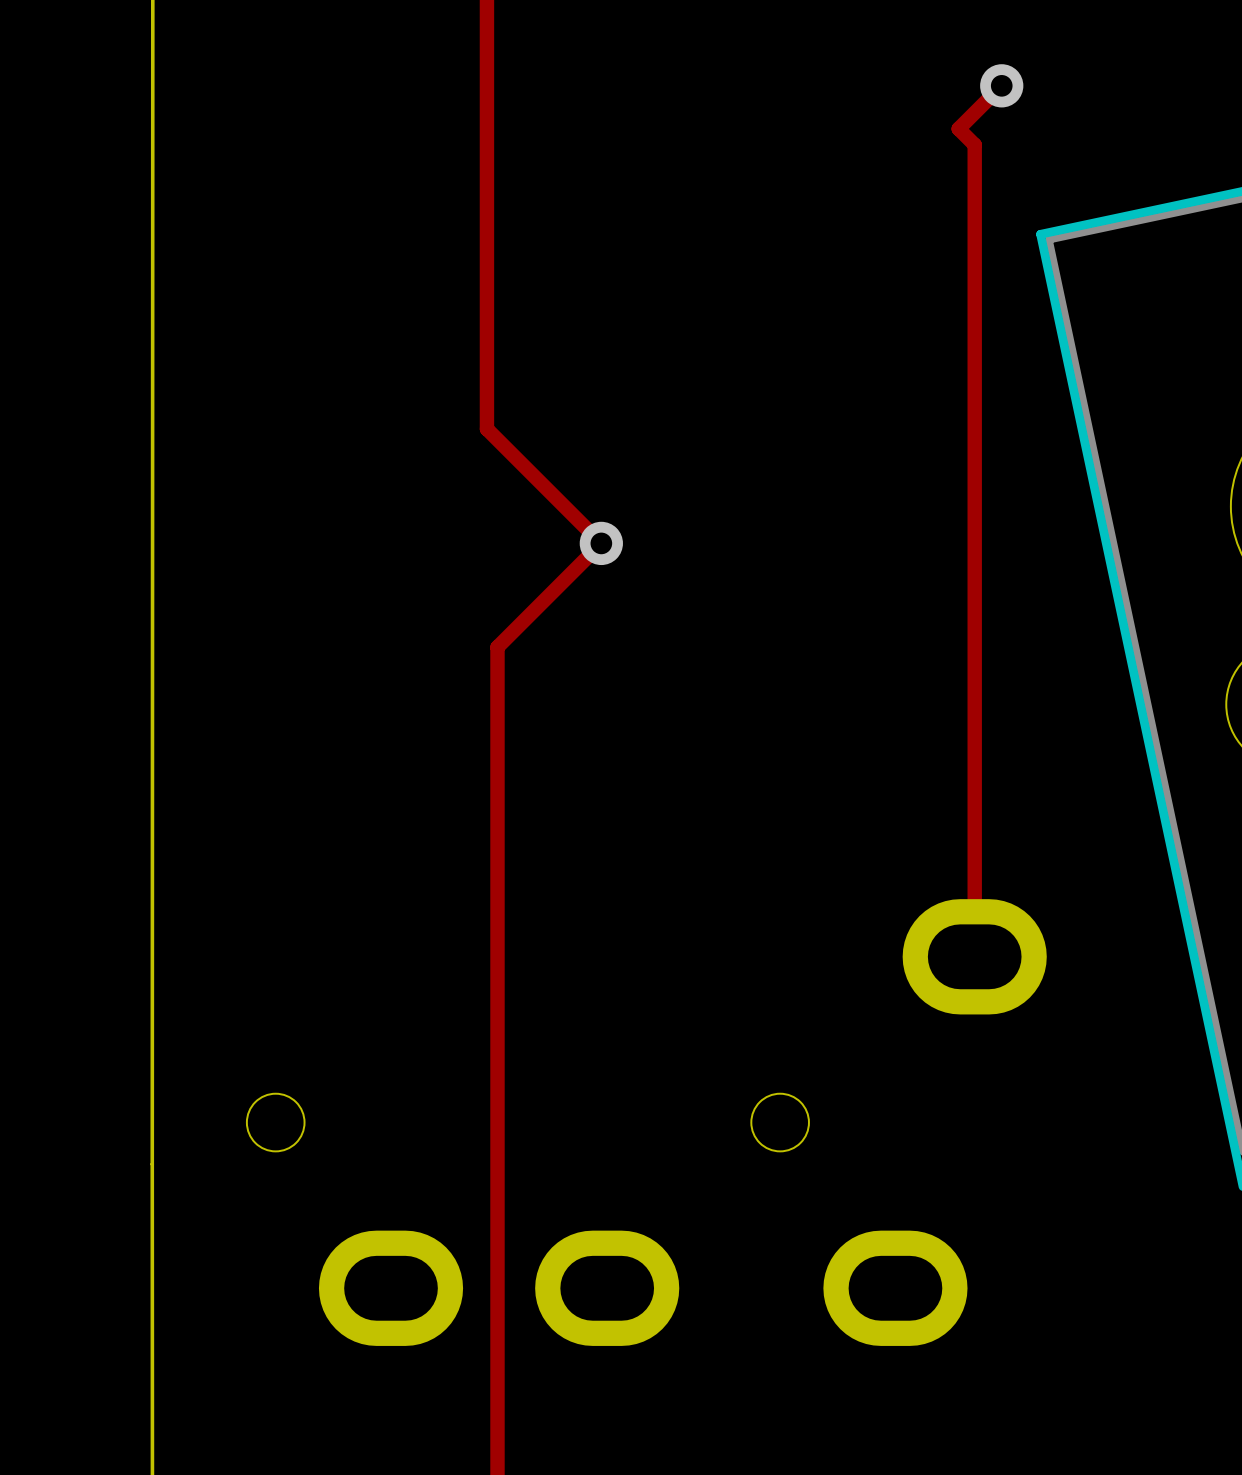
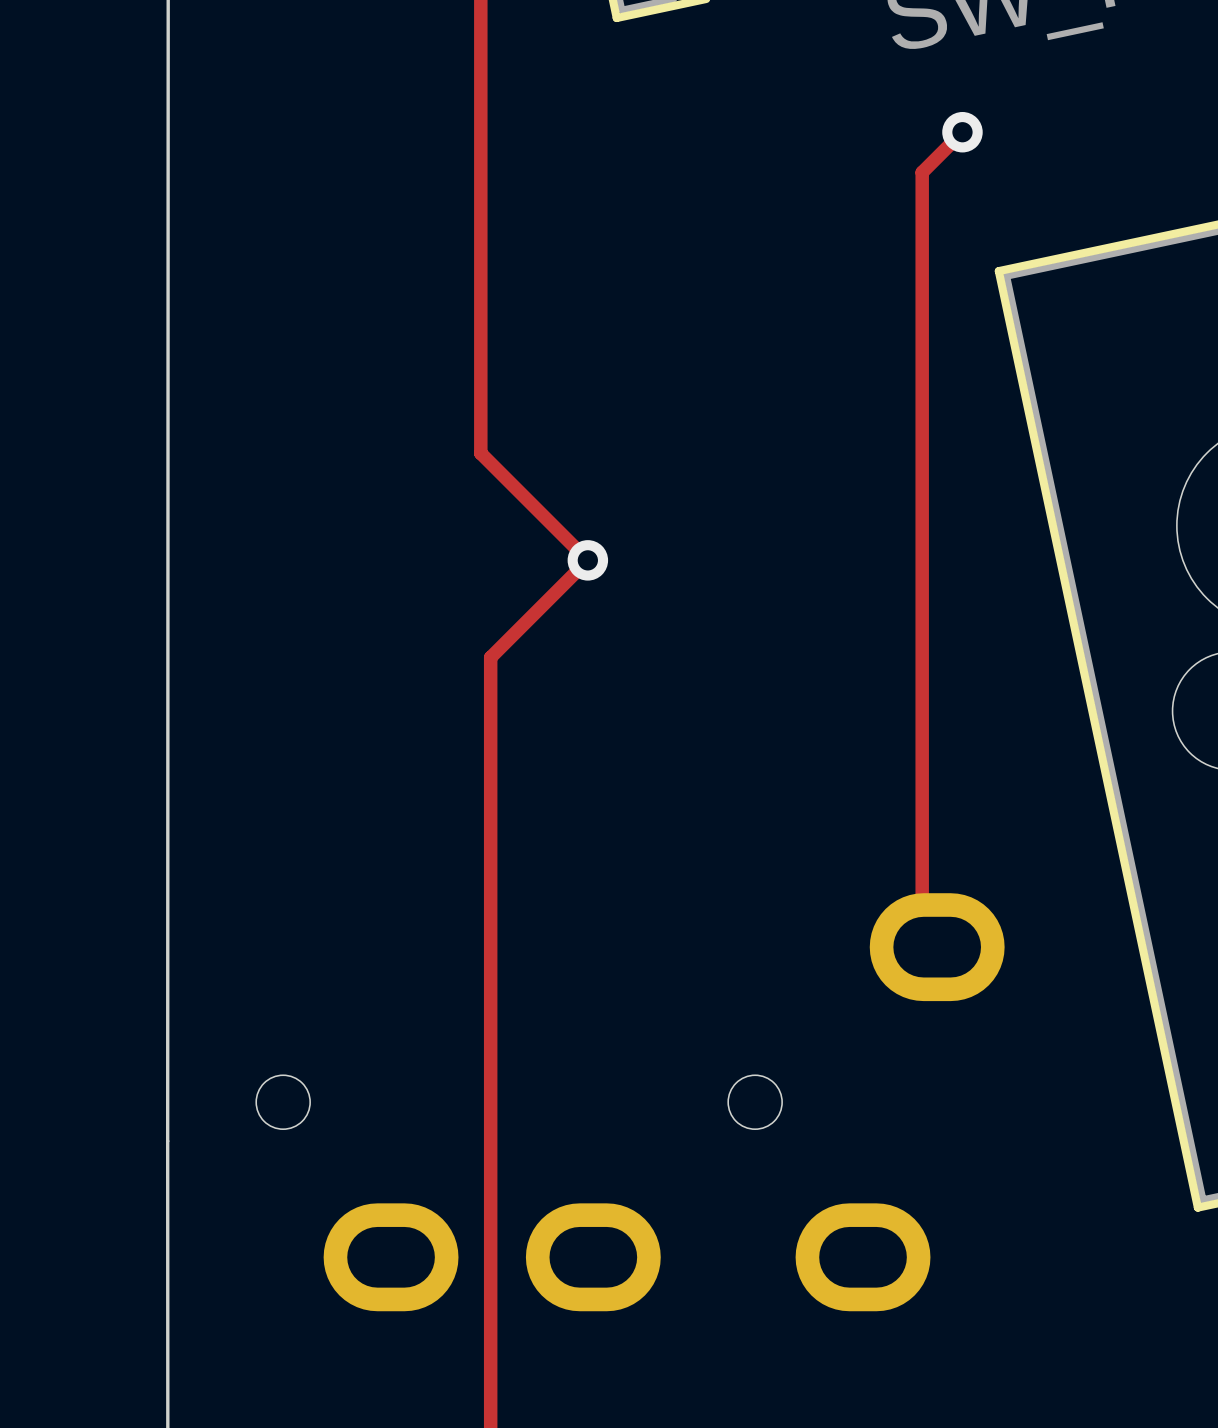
track: (958, 128) (974, 144) (974, 956) -> (922, 172) (922, 947)

